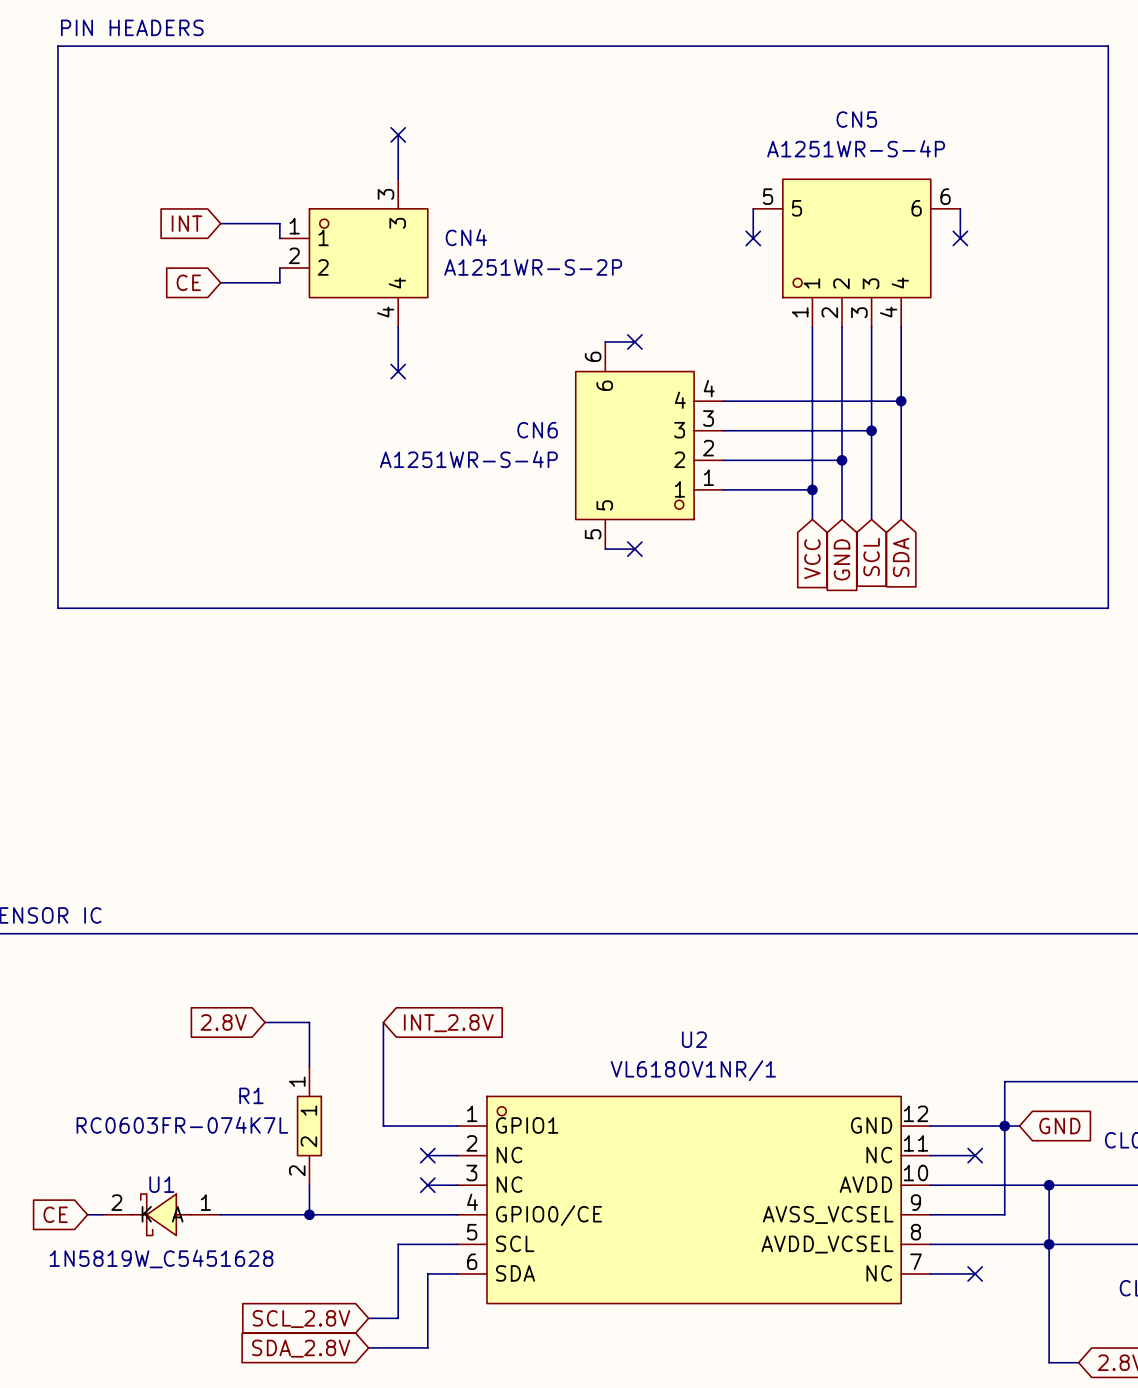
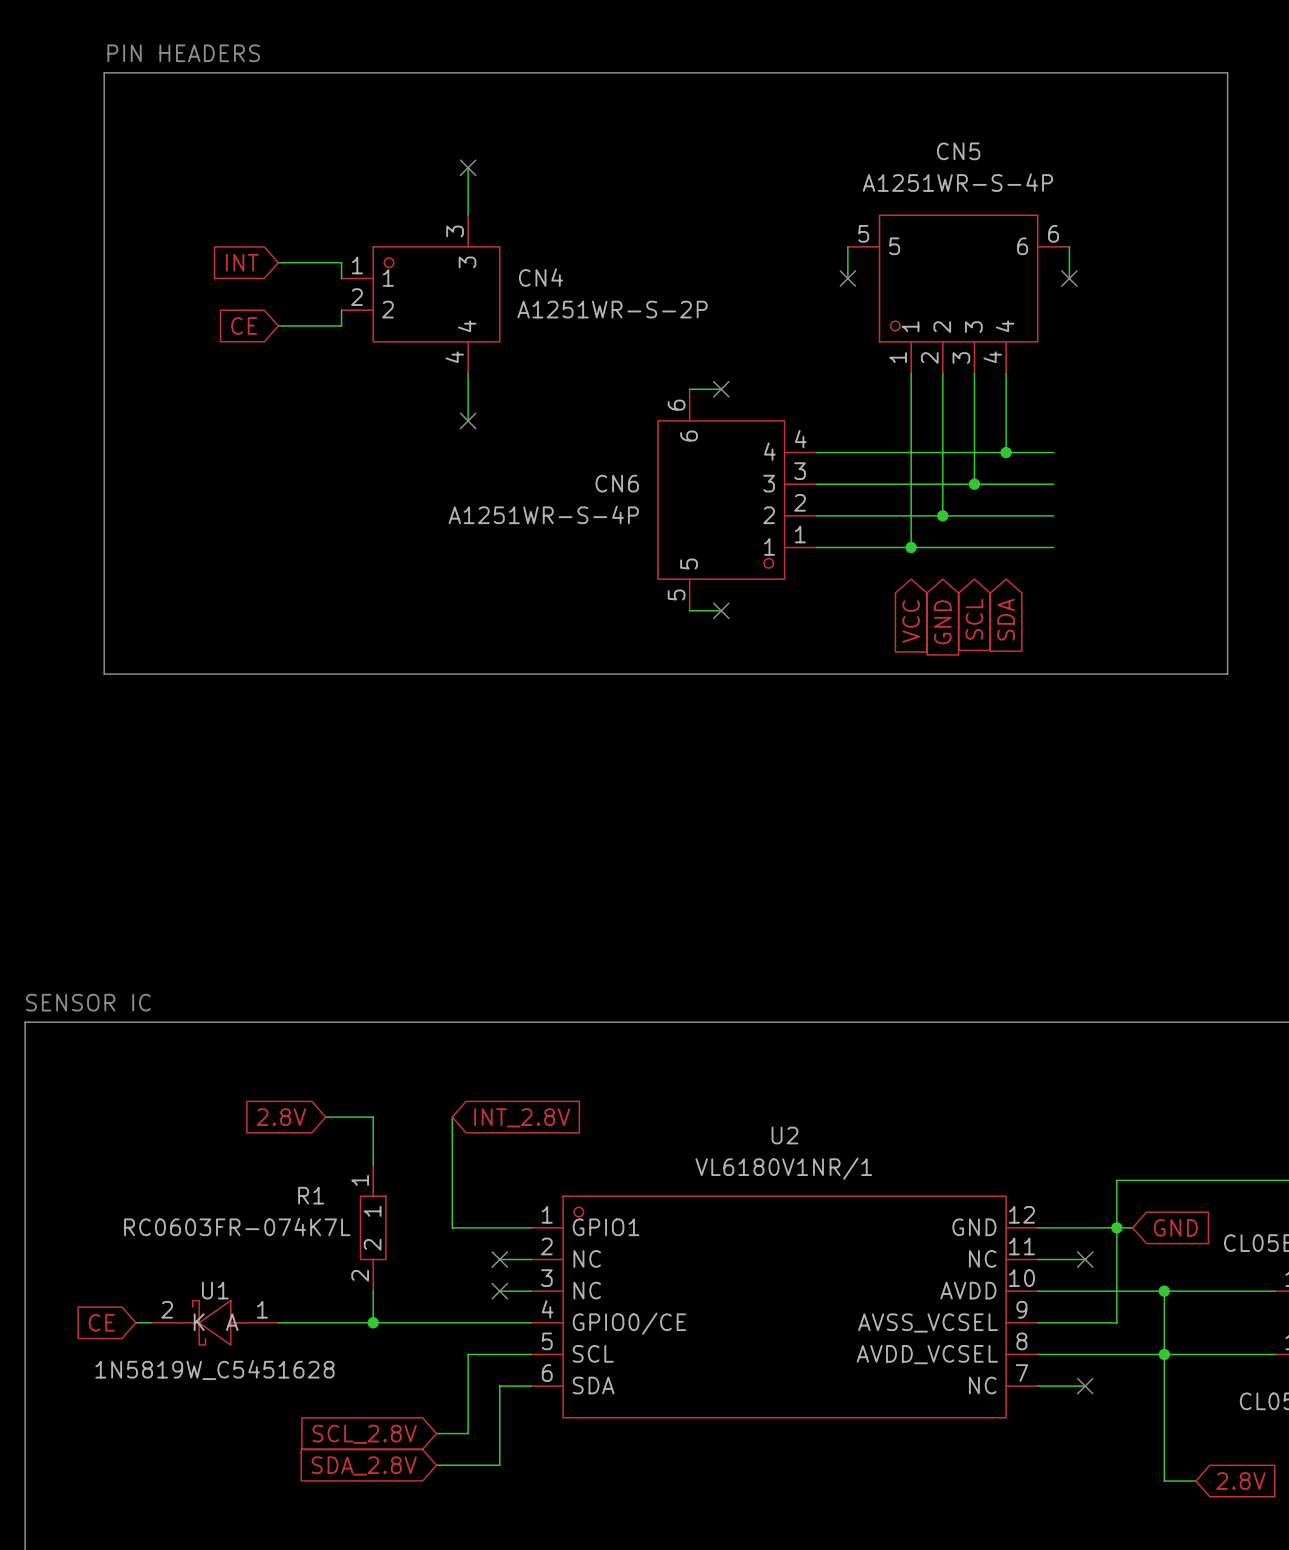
wire: (901, 401) (901, 519) -> (1006, 452) (1053, 452)
wire: (871, 430) (871, 519) -> (974, 484) (1053, 484)
wire: (842, 460) (842, 519) -> (942, 515) (1053, 515)
wire: (812, 489) (812, 519) -> (911, 547) (1053, 547)

